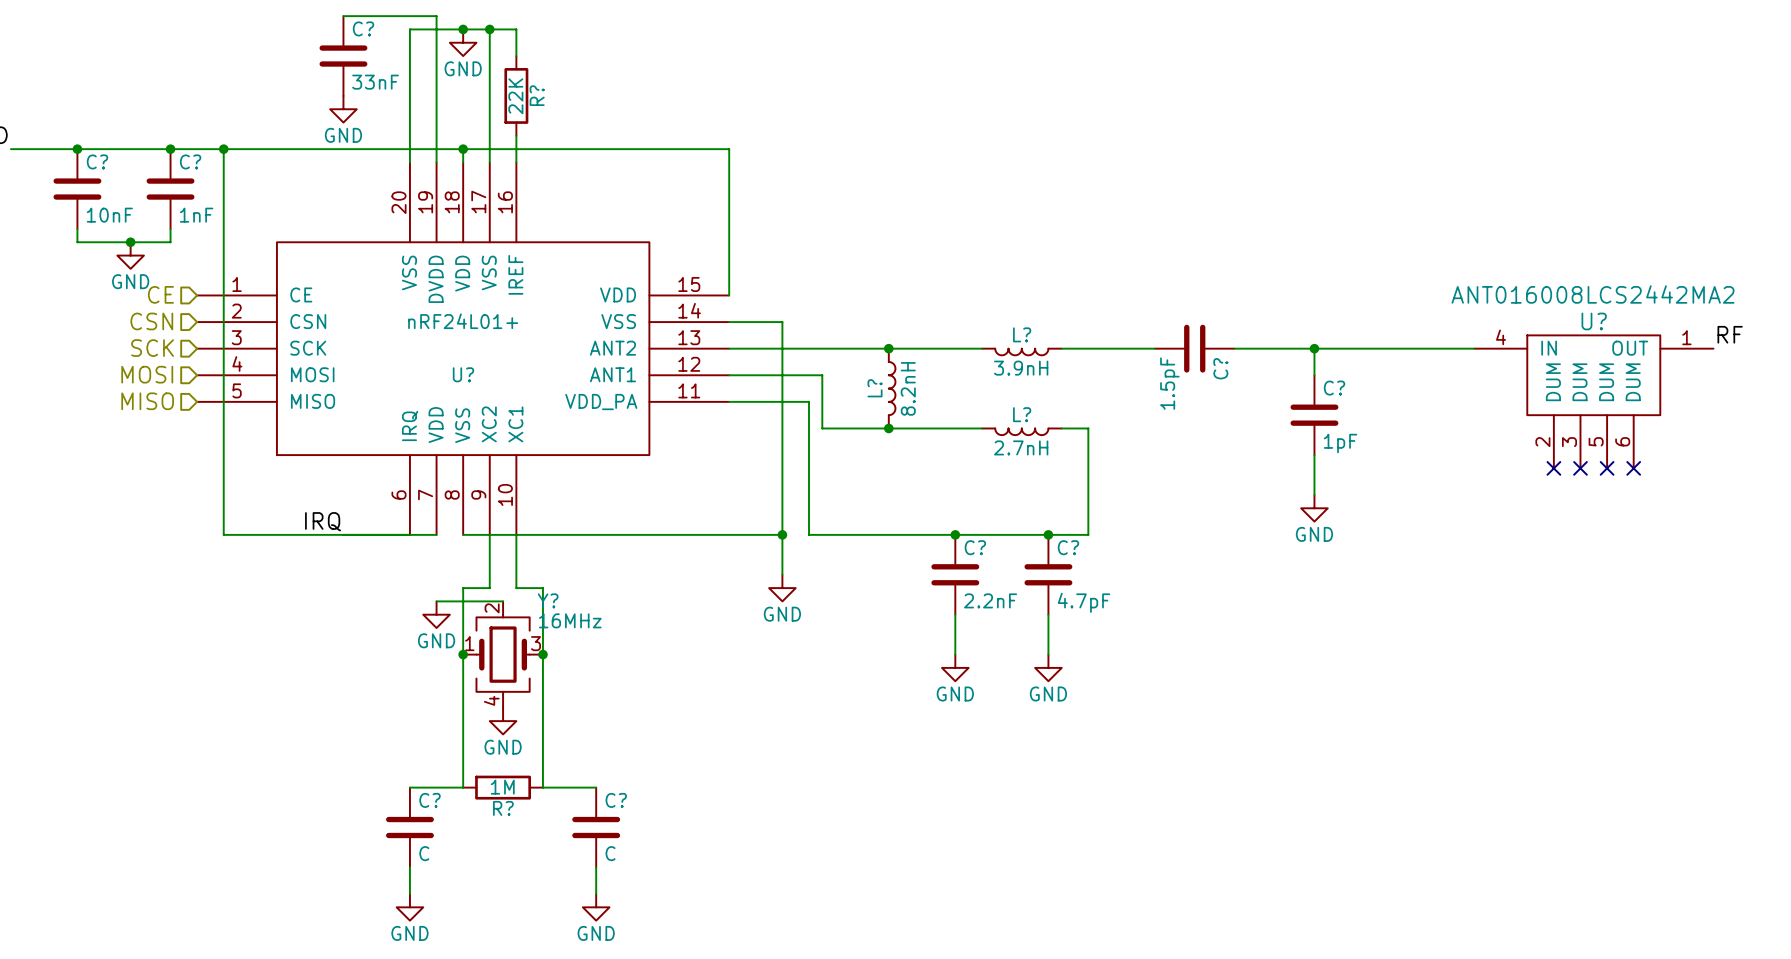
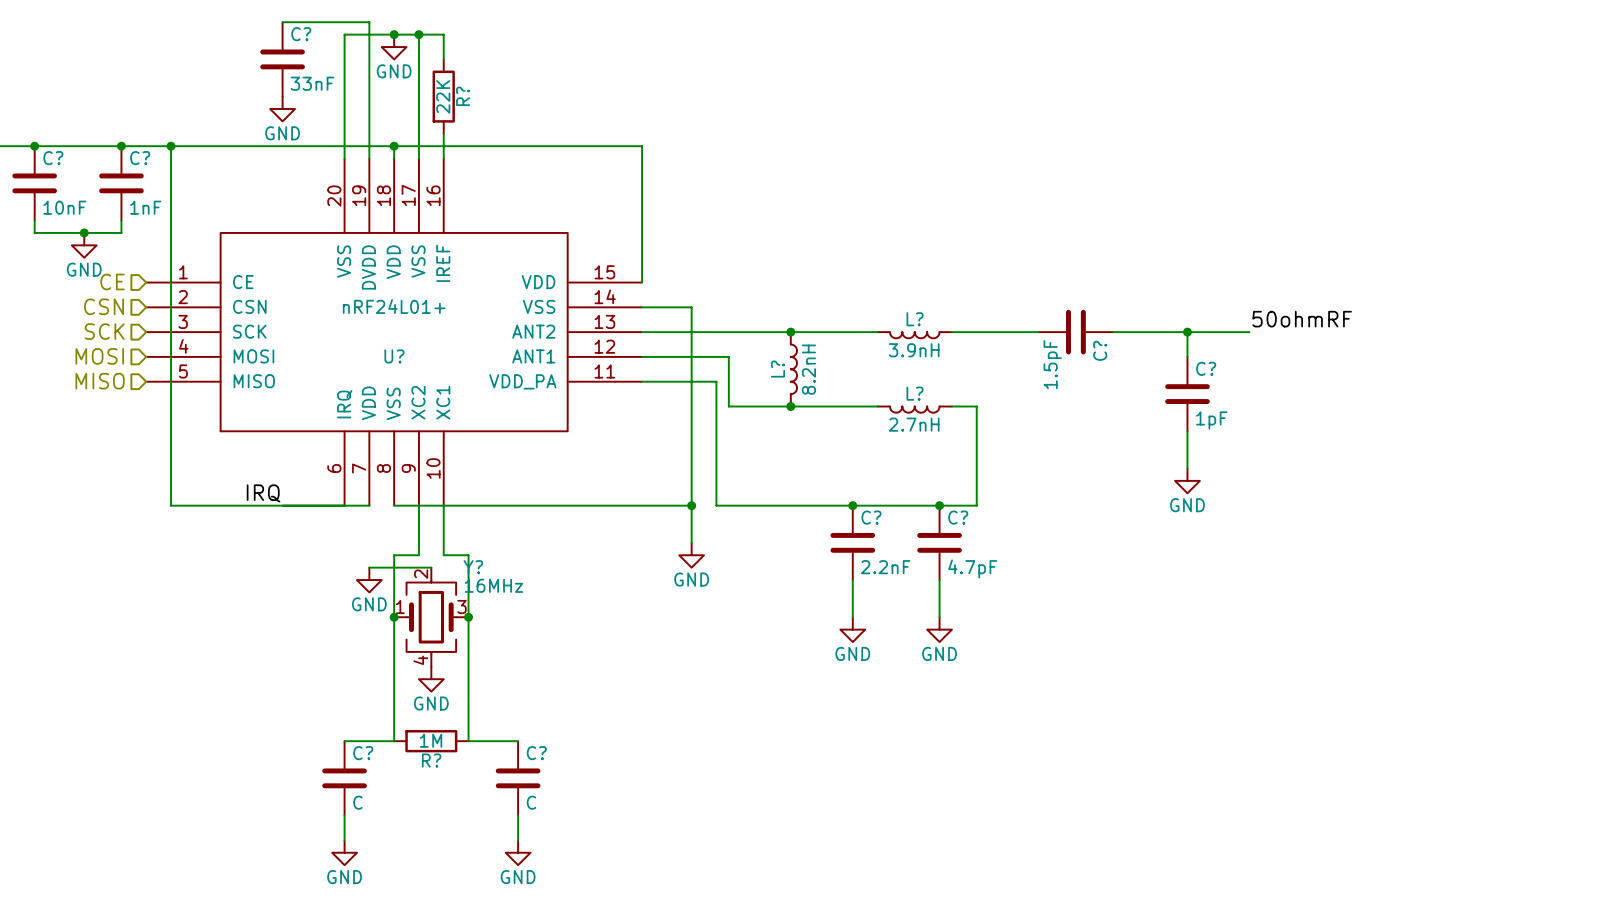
label: none -> 50ohmRF (1302, 319)
label: RF (1730, 334) -> none
wire: (1380, 348) (1474, 348) -> none
U?: ANT016008LCS2442MA2 (1593, 401) -> none
no-connect mark: (1553, 468) -> none
no-connect mark: (1580, 468) -> none
no-connect mark: (1607, 468) -> none
no-connect mark: (1633, 468) -> none

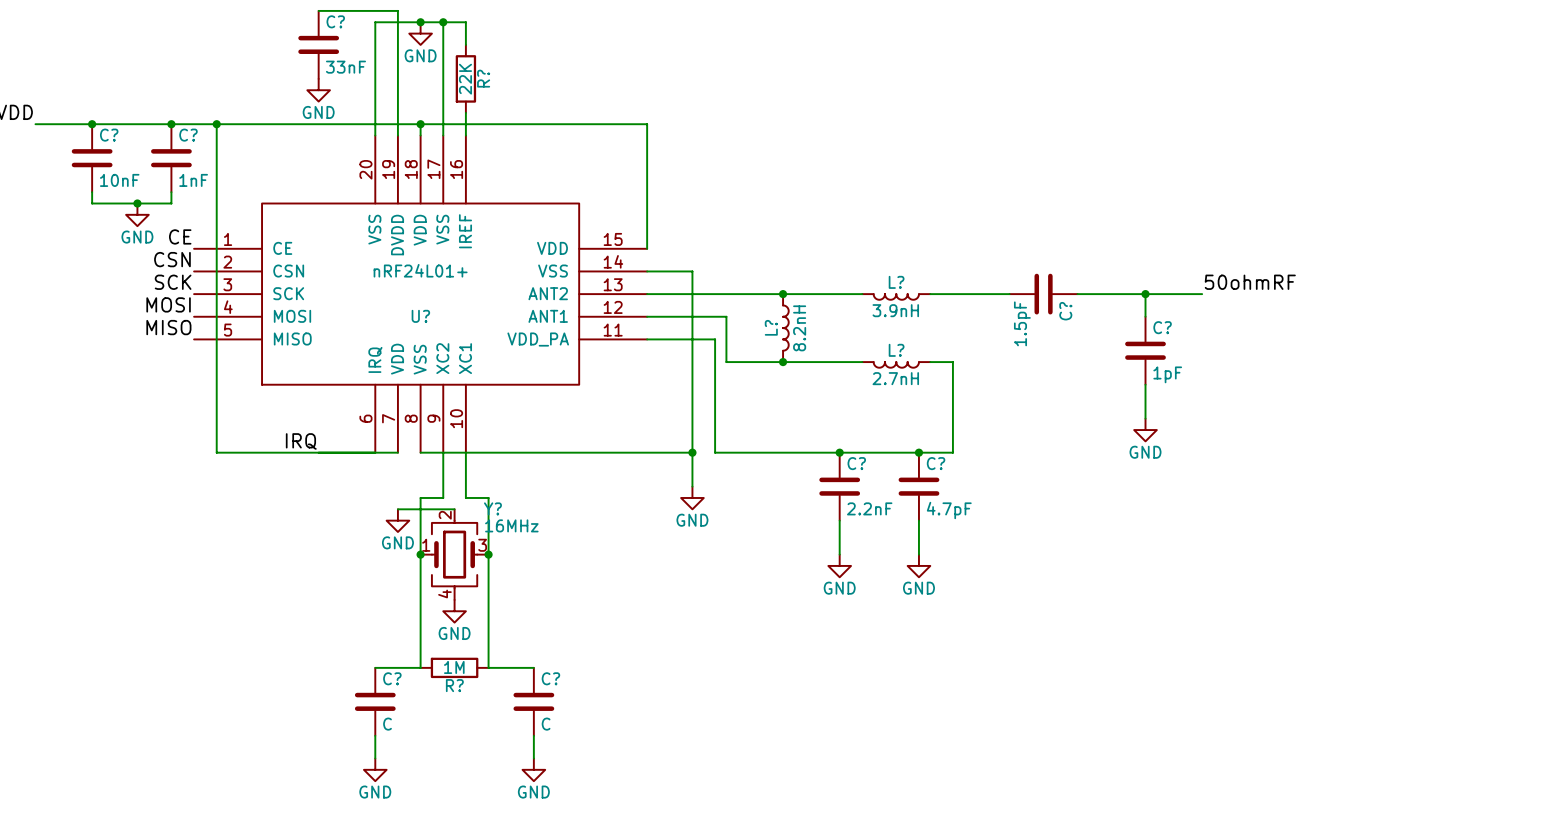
label: none -> CE (180, 236)
hierarchical label: CE (112, 281) -> none
label: none -> CSN (172, 259)
hierarchical label: CSN (104, 306) -> none
label: none -> SCK (173, 282)
hierarchical label: SCK (104, 331) -> none
label: none -> MOSI (168, 304)
hierarchical label: MOSI (99, 356) -> none
label: none -> MISO (168, 327)
hierarchical label: MISO (100, 381) -> none

